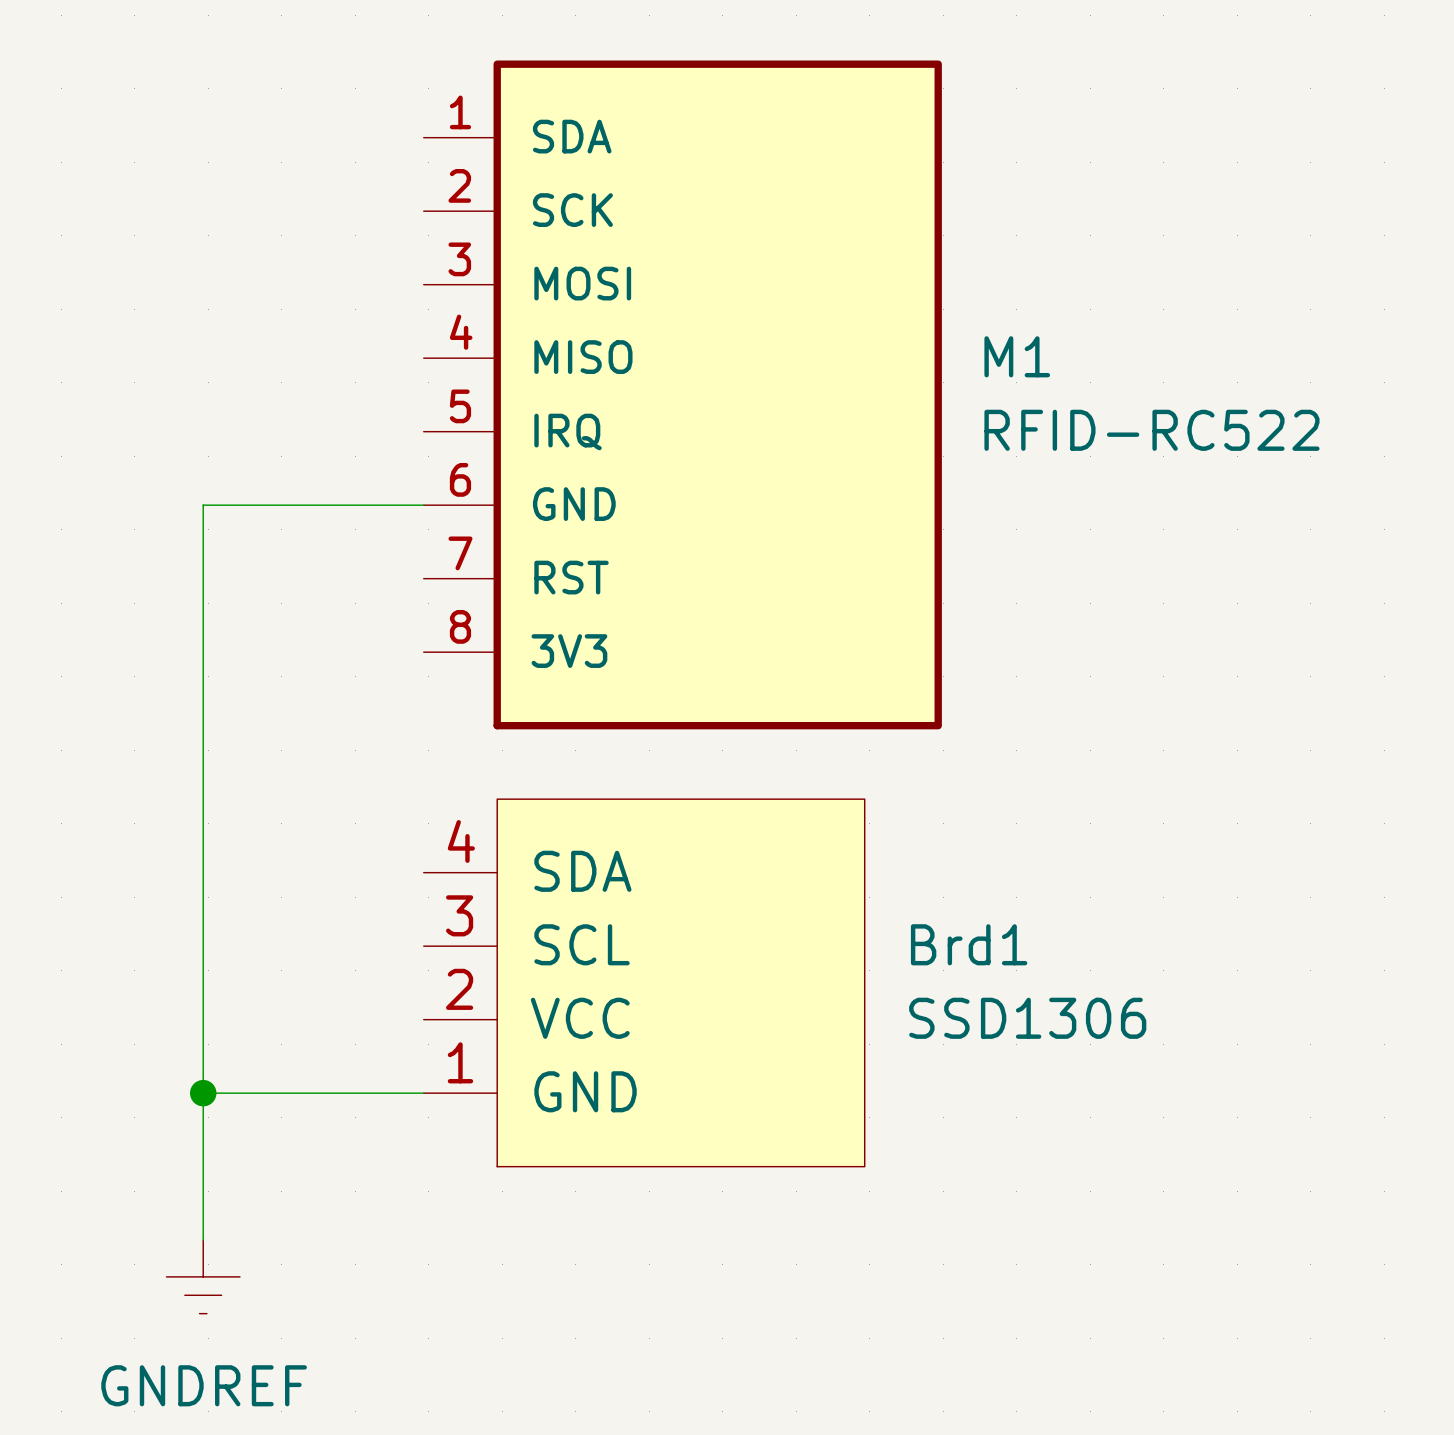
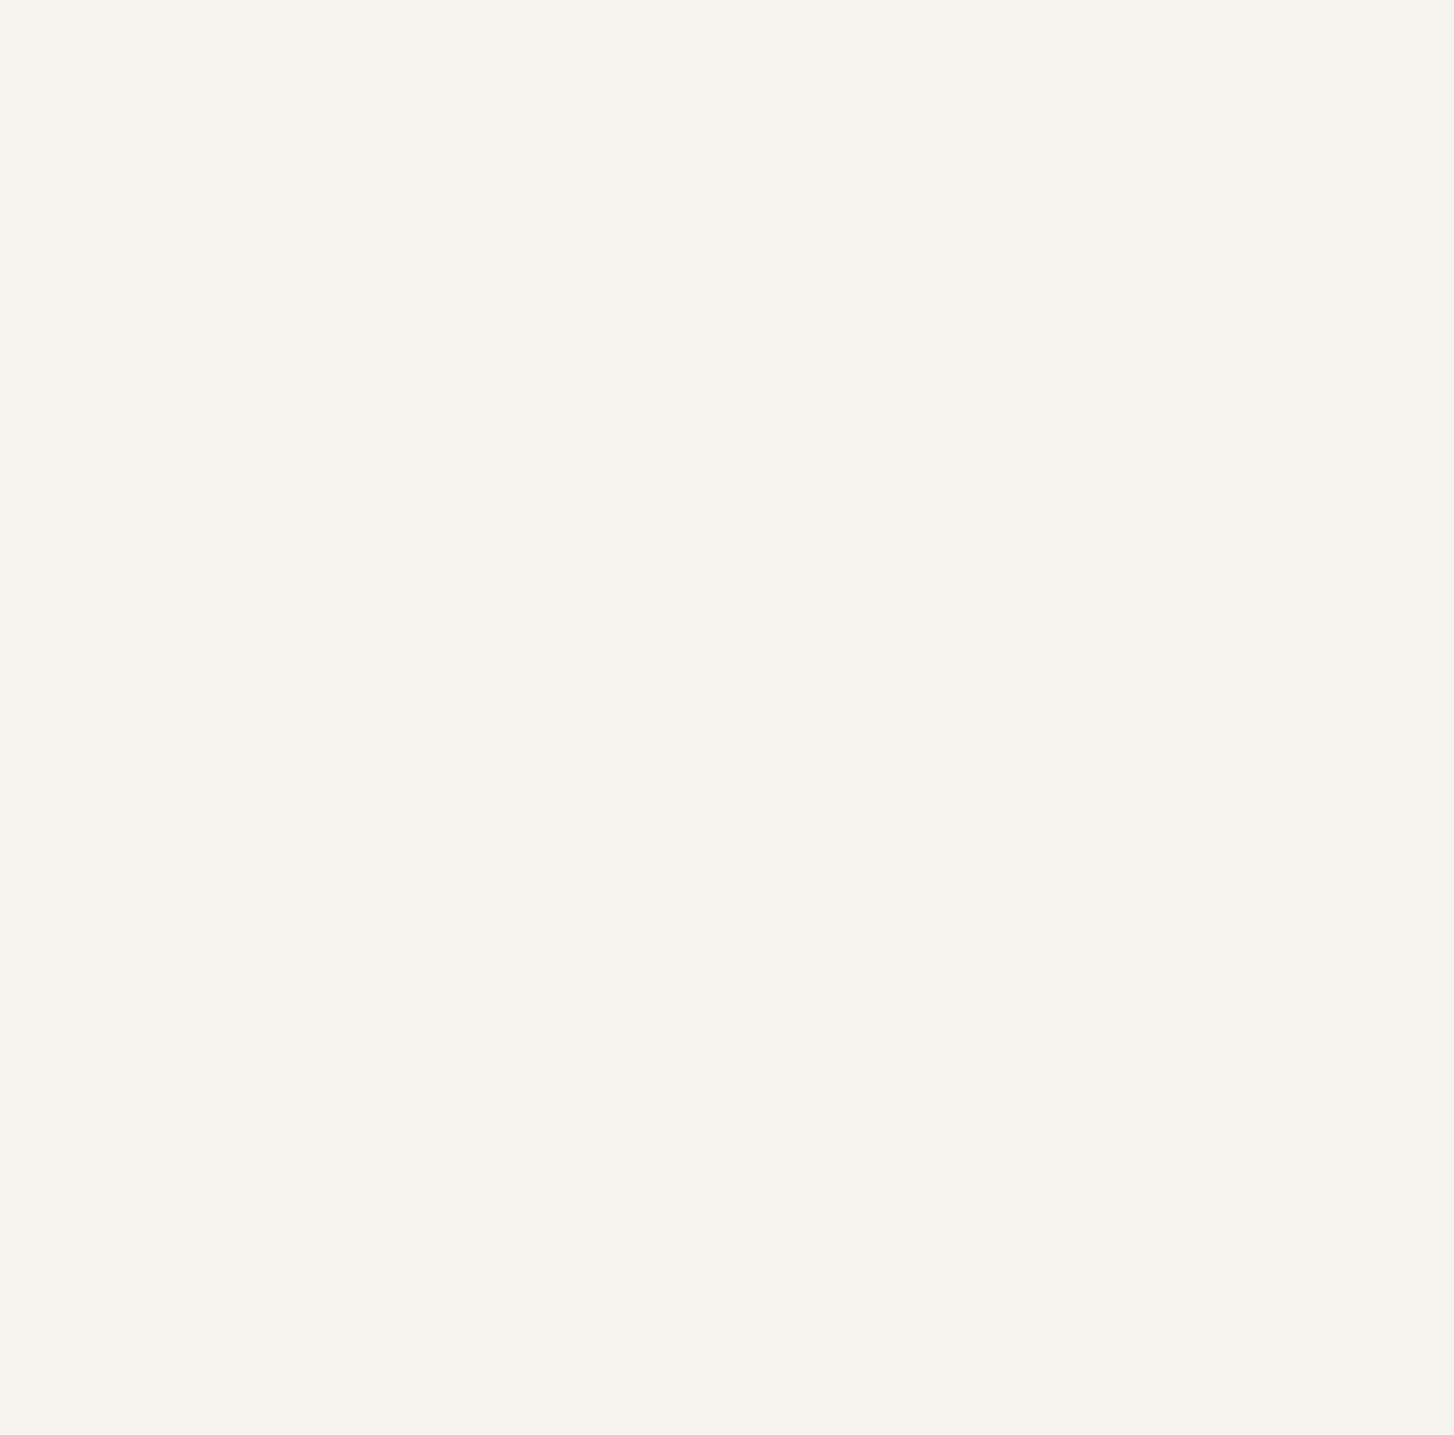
M1: RFID-RC522 (682, 394) -> none
wire: (423, 505) (203, 505) (203, 1240) -> none
Brd1: SSD1306 (644, 982) -> none
wire: (203, 1093) (423, 1093) -> none
junction: (203, 1093) -> none
power symbol: GNDREF (203, 1276) -> none

